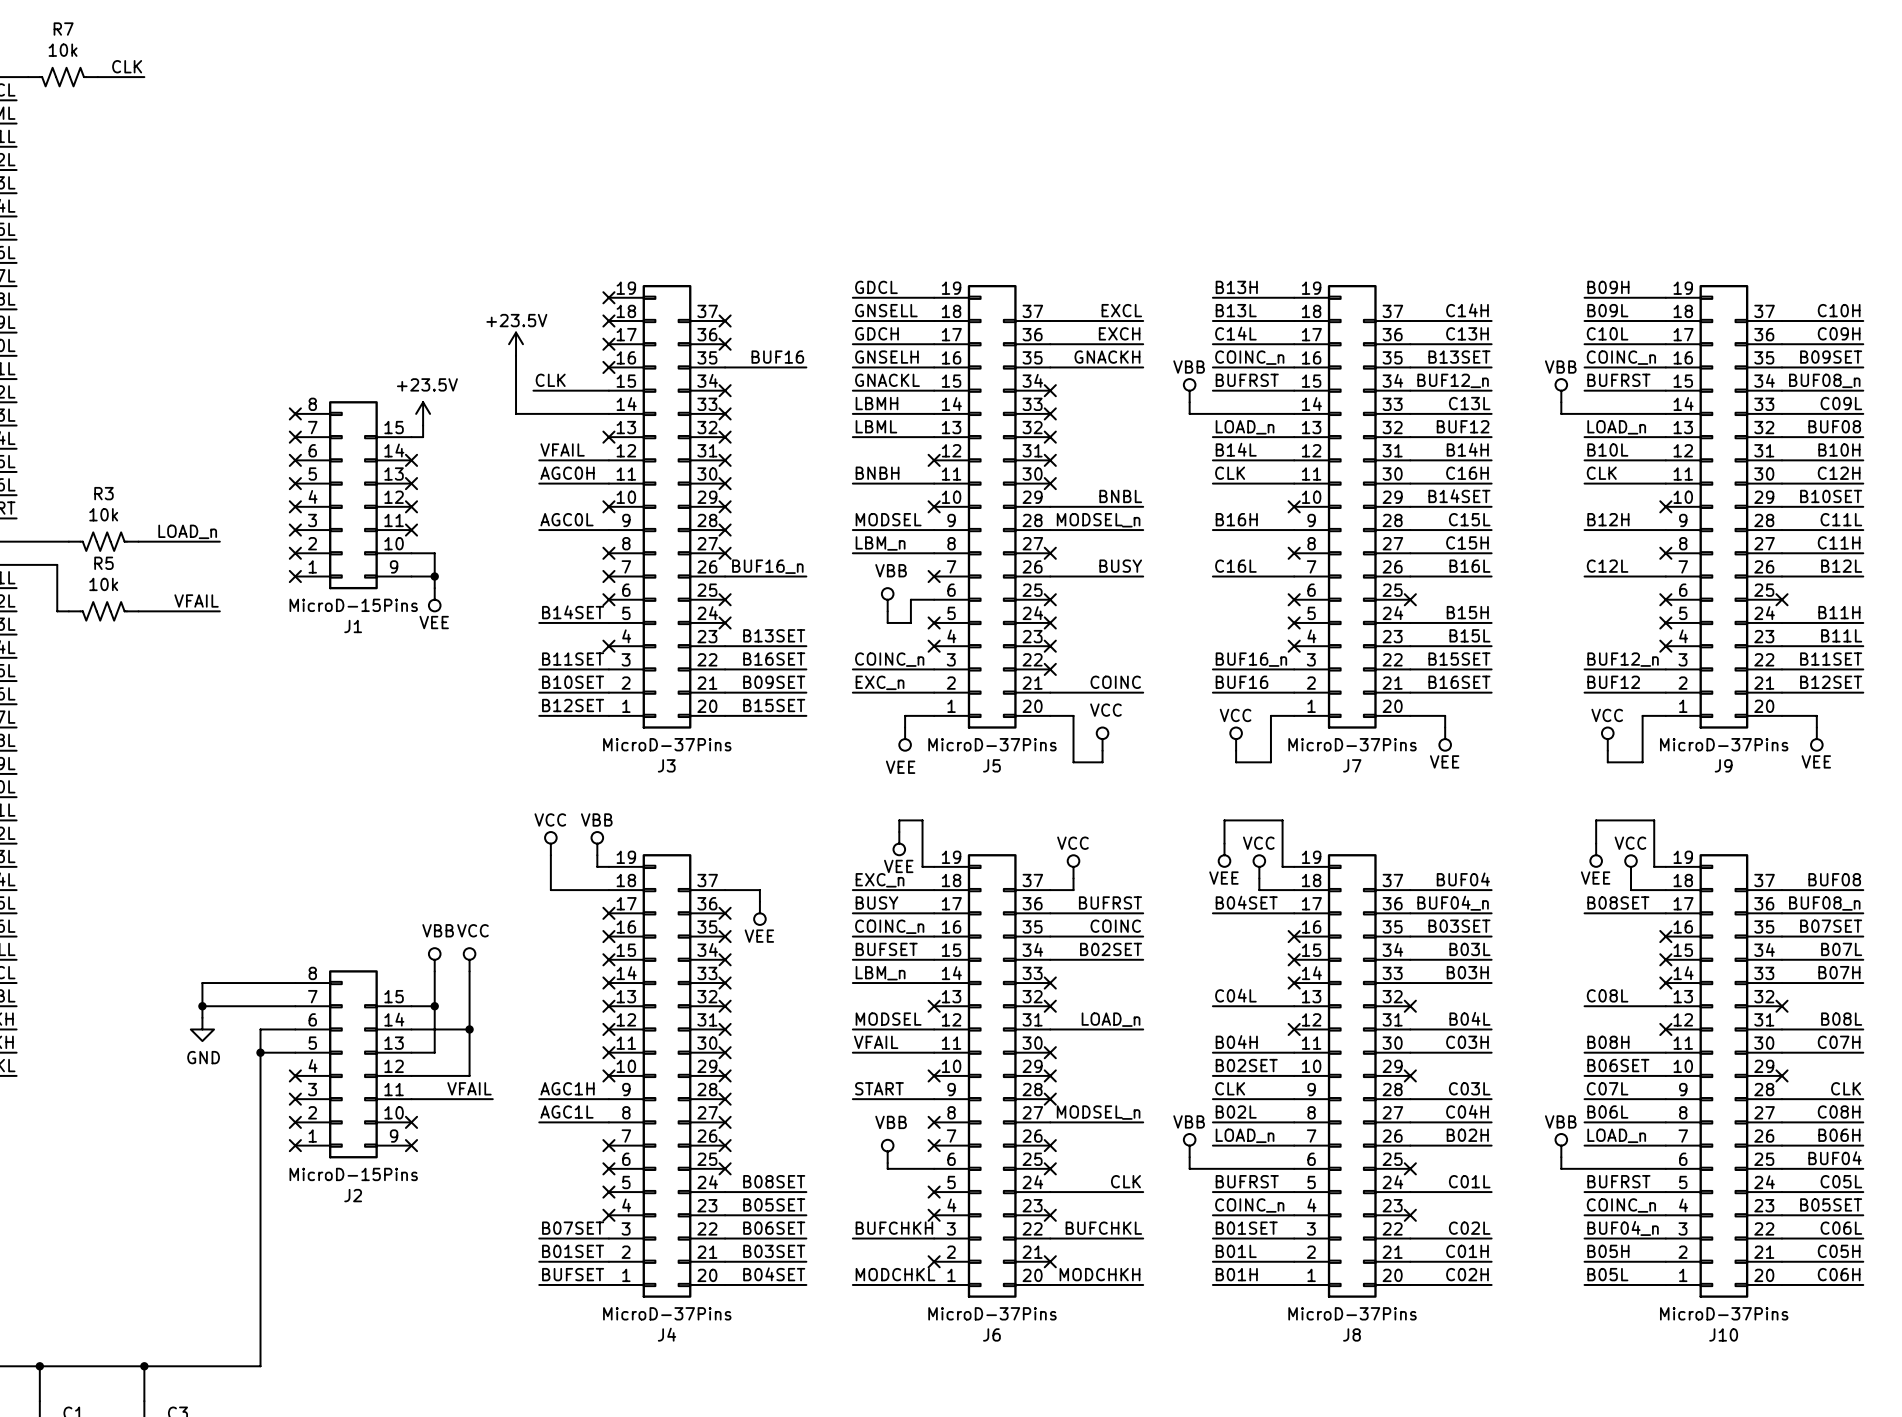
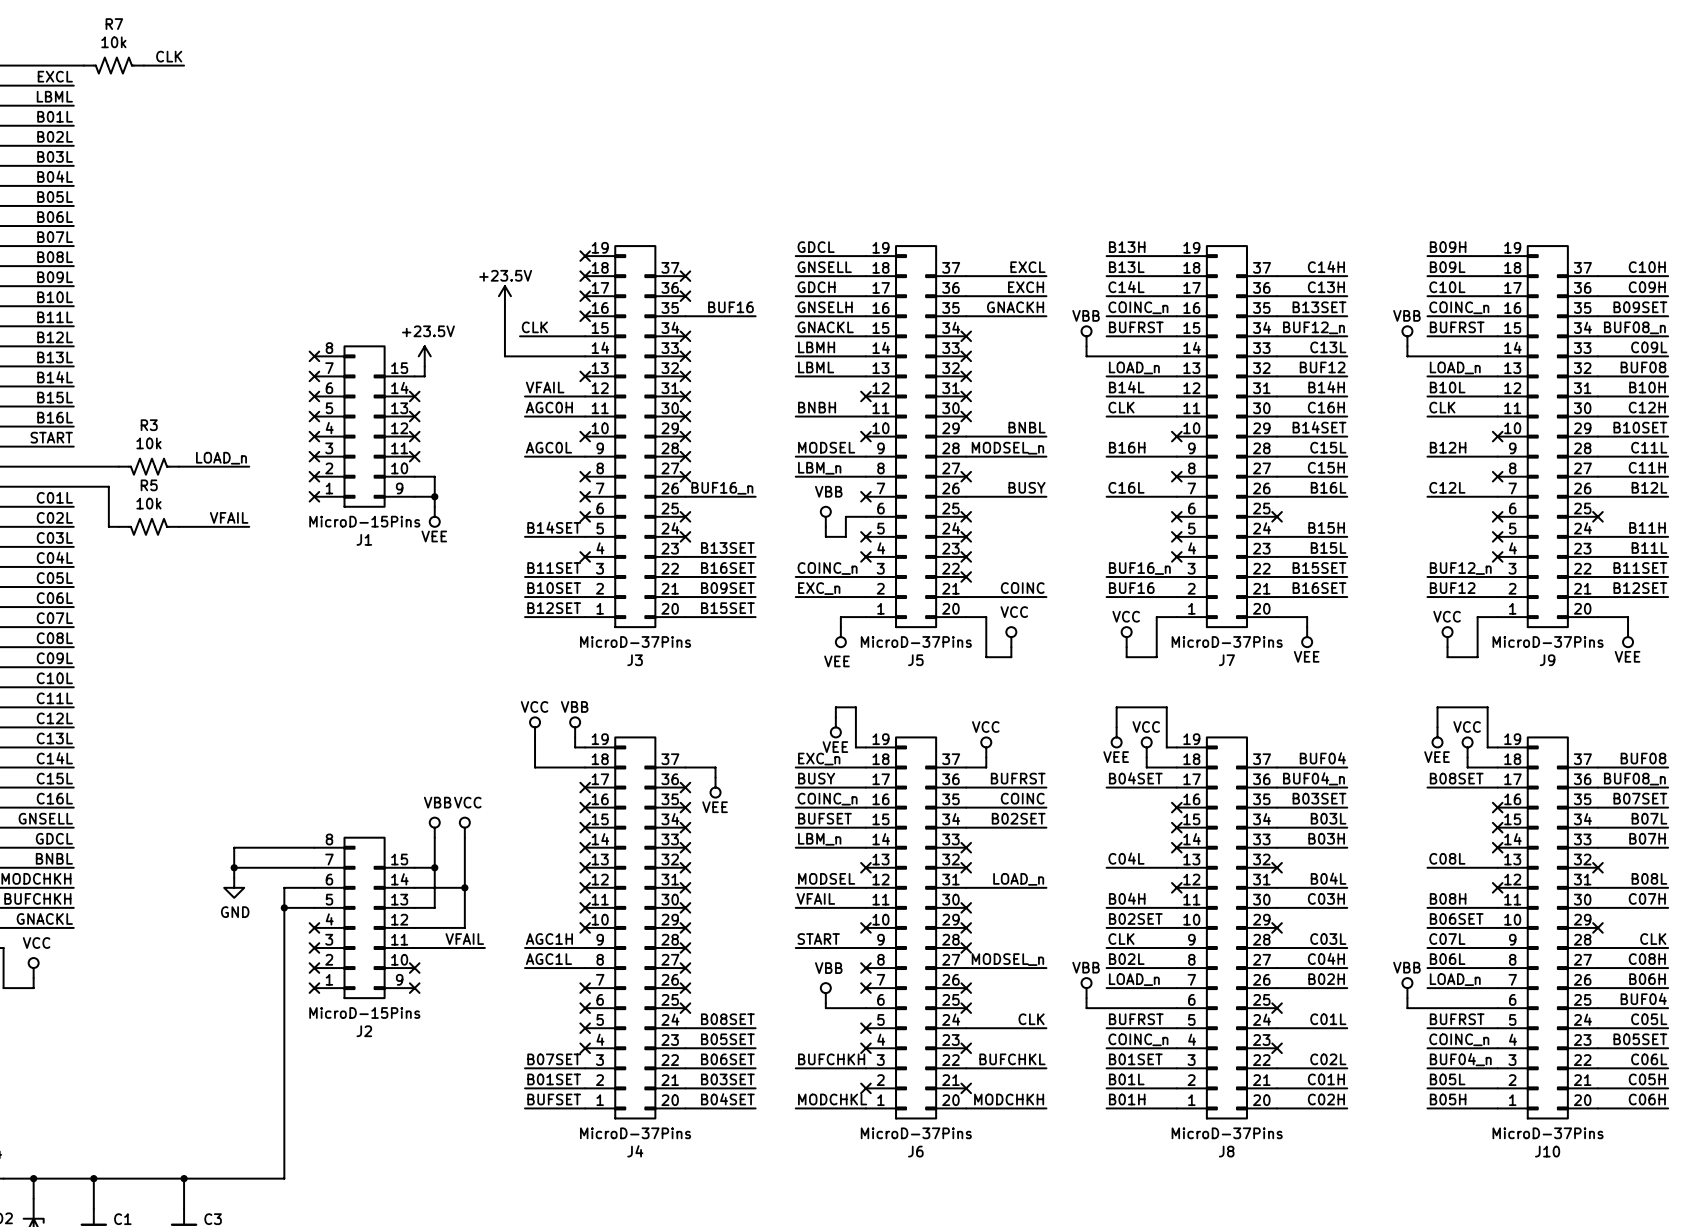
label: B05H (1608, 1251) -> B05L (1447, 1079)
label: B05L (1607, 1274) -> B05H (1448, 1099)

